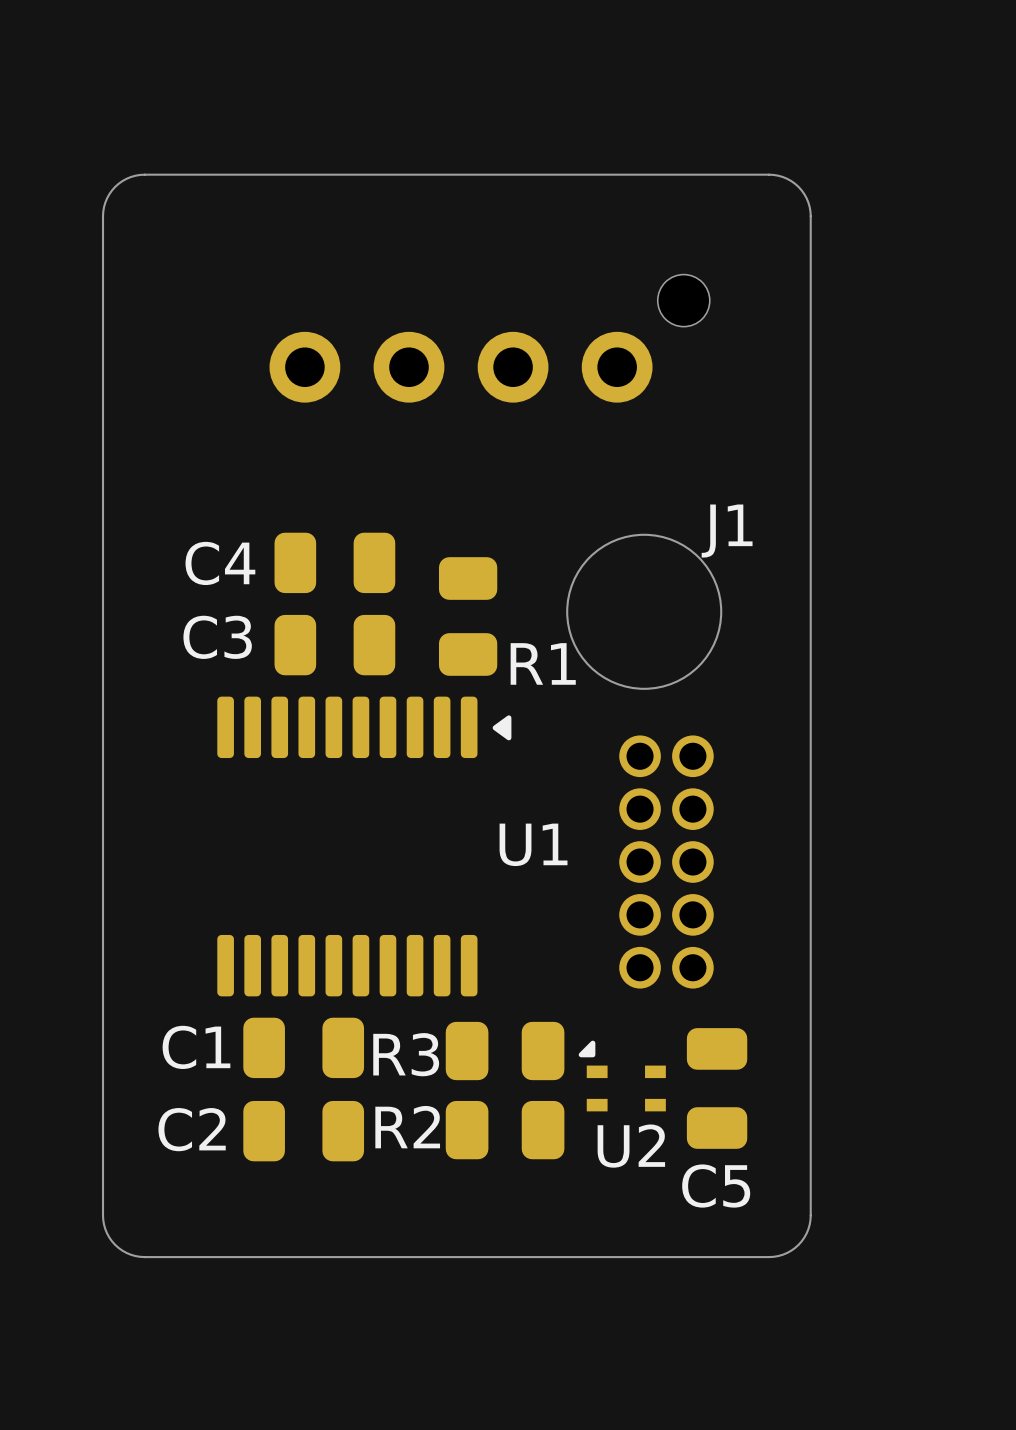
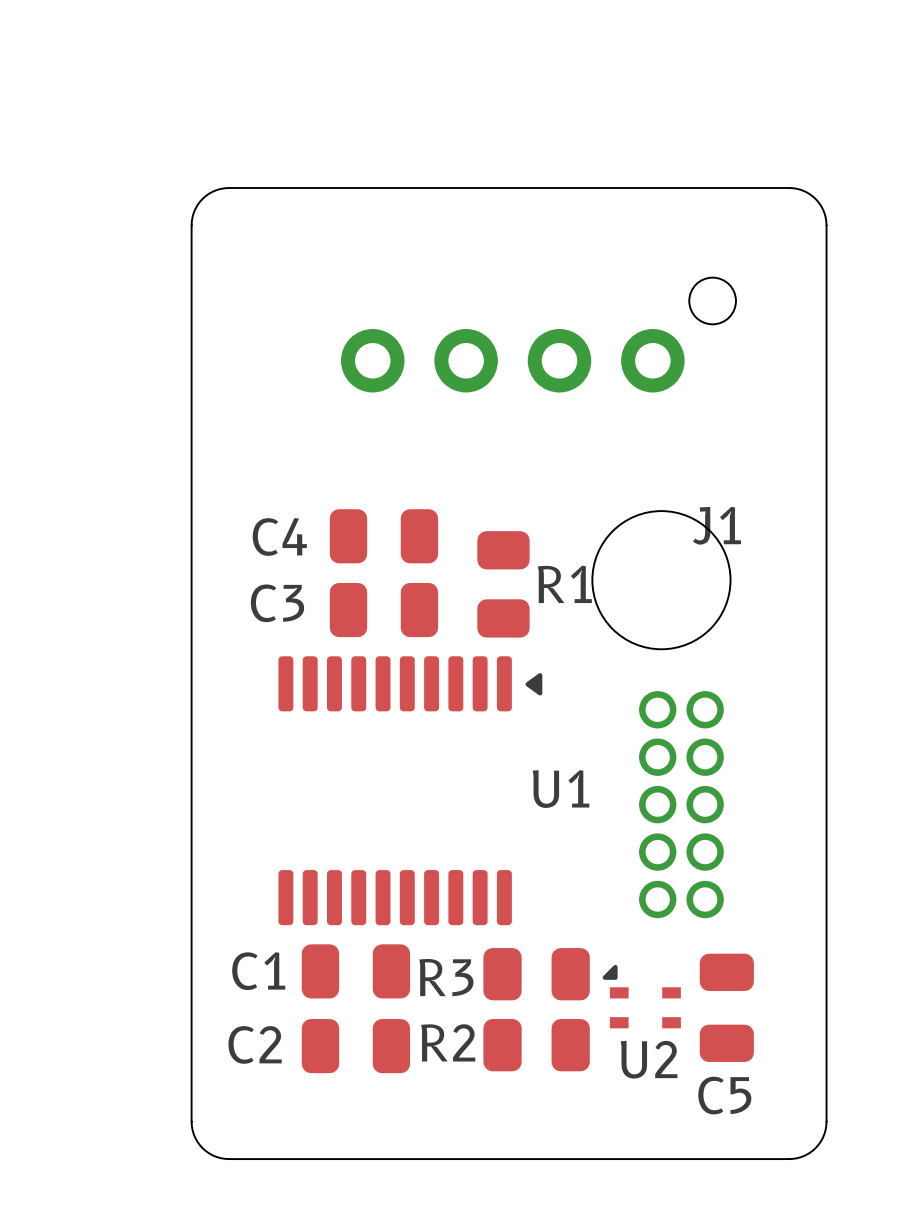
board edge: (162, 174) (139, 174) (122, 181) (115, 186) (107, 198) (103, 216) (103, 1220) (109, 1237) (122, 1250) (139, 1256) (162, 1257) -> (228, 188) (212, 191) (202, 198) (193, 213) (191, 225) (191, 1121) (195, 1137) (202, 1148) (212, 1155) (228, 1159)
board edge: (769, 174) (787, 178) (798, 186) (806, 198) (810, 216) (810, 1215) (806, 1233) (798, 1244) (787, 1252) (769, 1257) -> (773, 188) (793, 188) (809, 193) (820, 205) (826, 225) (826, 1125) (820, 1141) (809, 1153) (793, 1158) (773, 1159)
J1 position: (489, 338) -> (538, 335)
J1 name position: J1 (727, 531) -> J1 (717, 525)
R1 name position: R1 (543, 663) -> R1 (564, 584)

